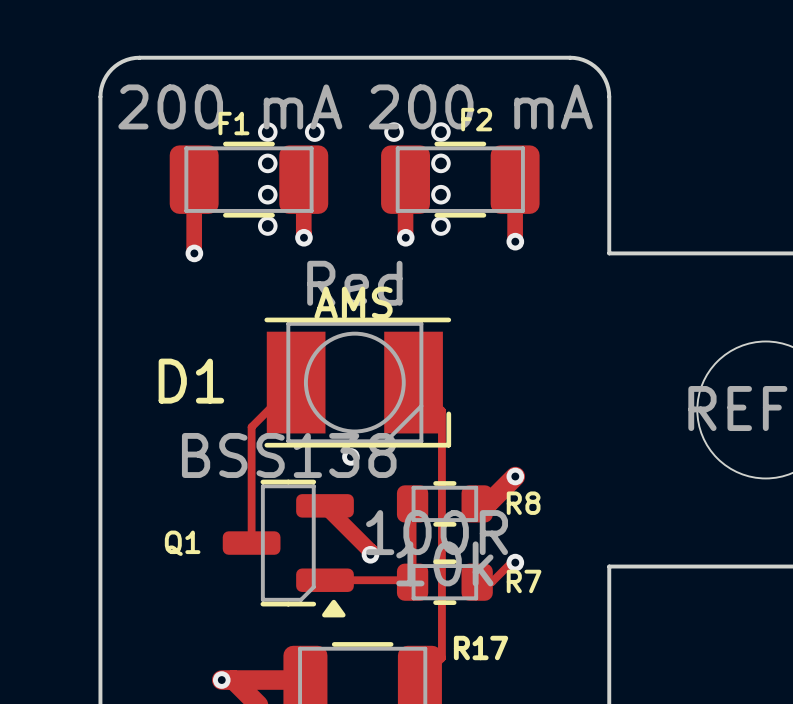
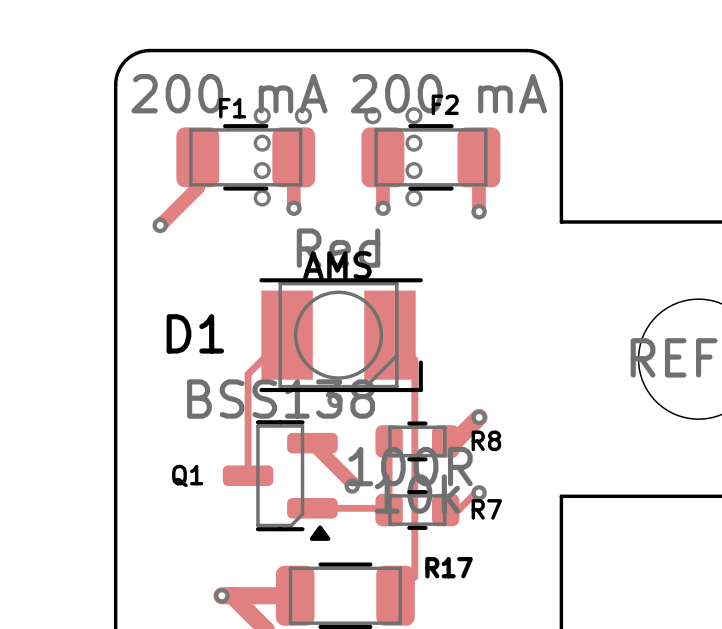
track: (194, 214) (194, 253) -> (197, 187) (160, 225)
via position: (194, 253) -> (160, 225)

